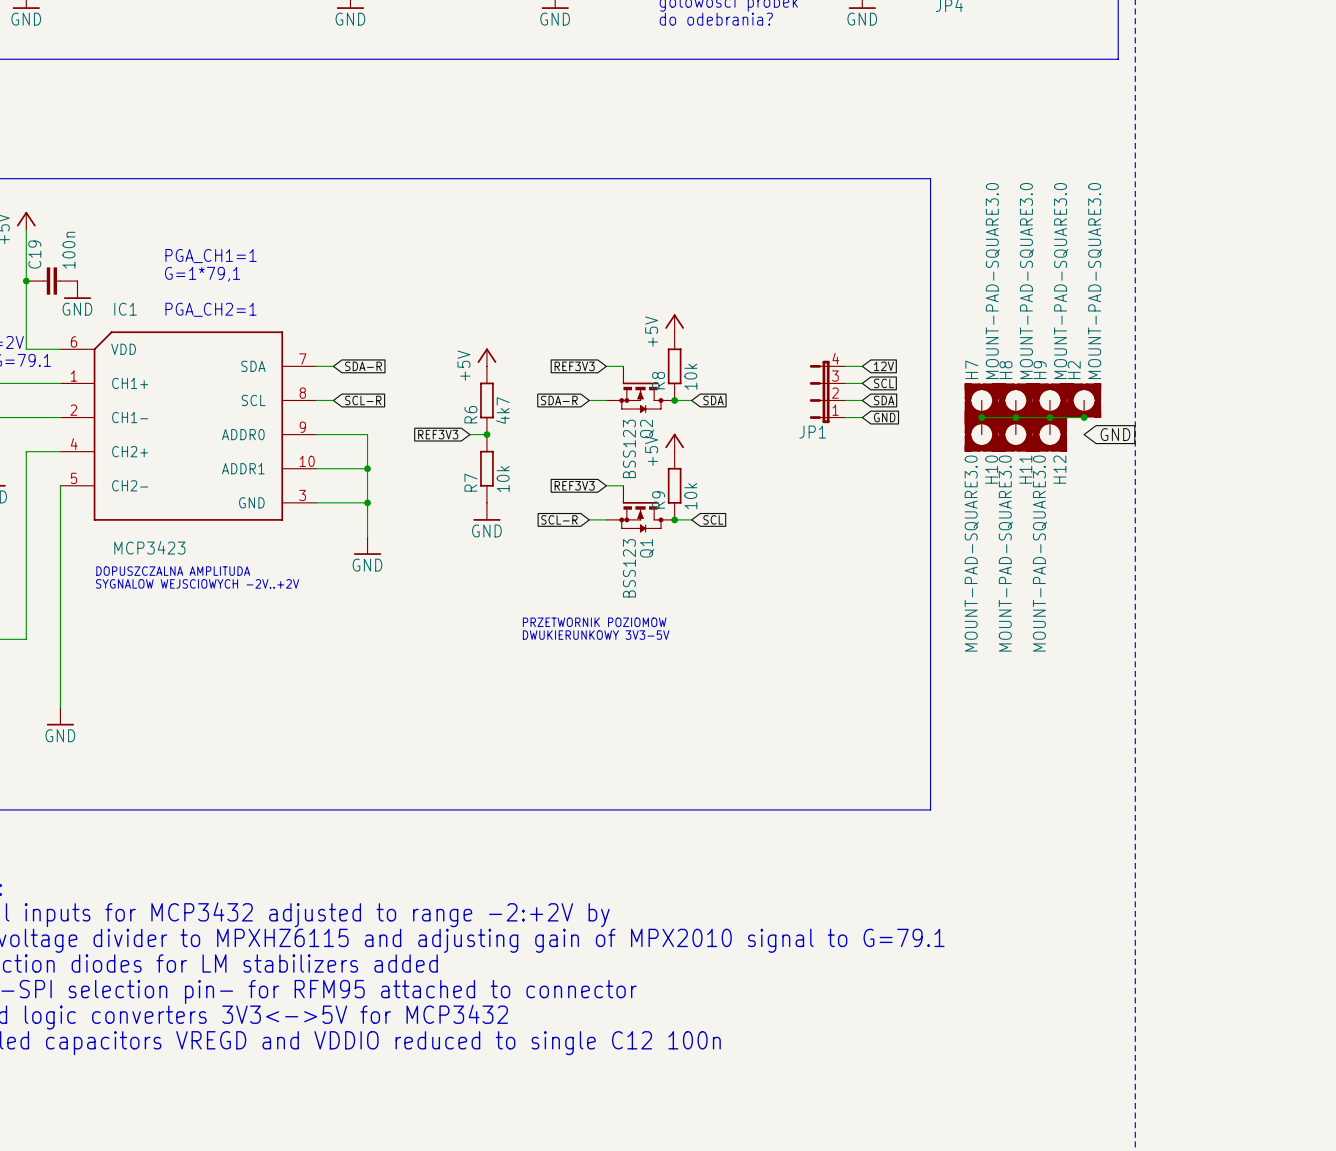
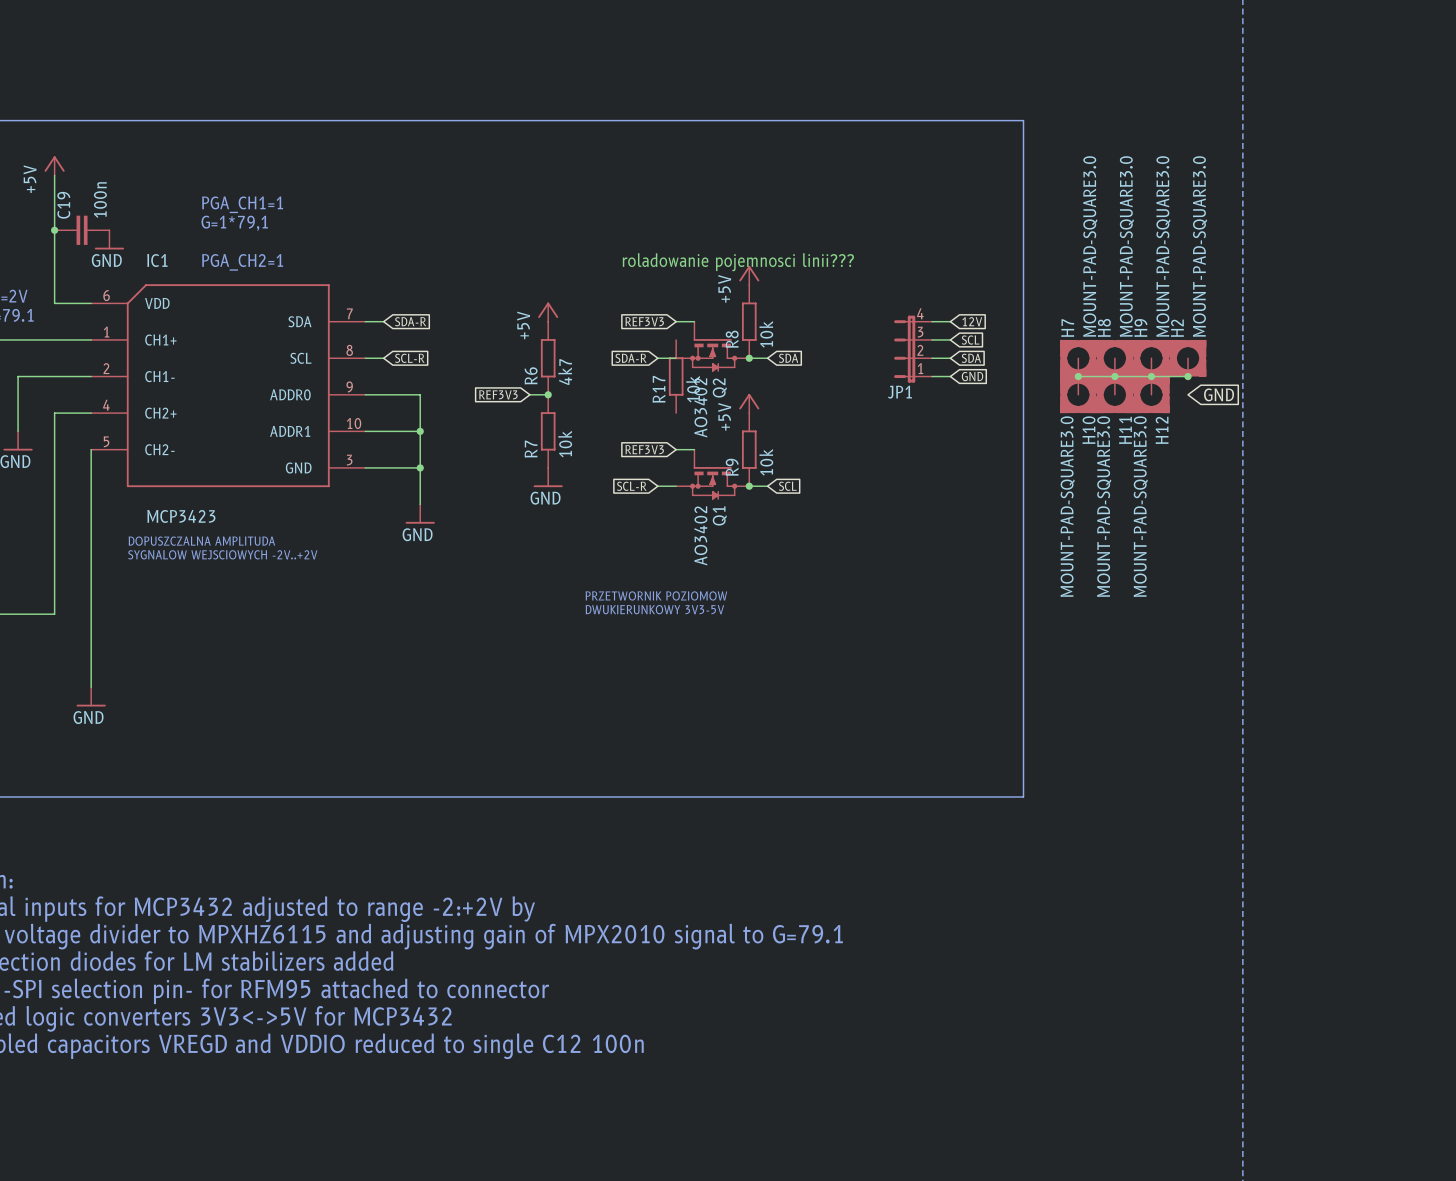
text: none -> roladowanie pojemnosci linii??? (738, 262)
R17: none -> 10k (676, 376)
Q2 value: BSS123 (629, 448) -> AO3402 (700, 407)
Q1 value: BSS123 (629, 568) -> AO3402 (700, 535)

